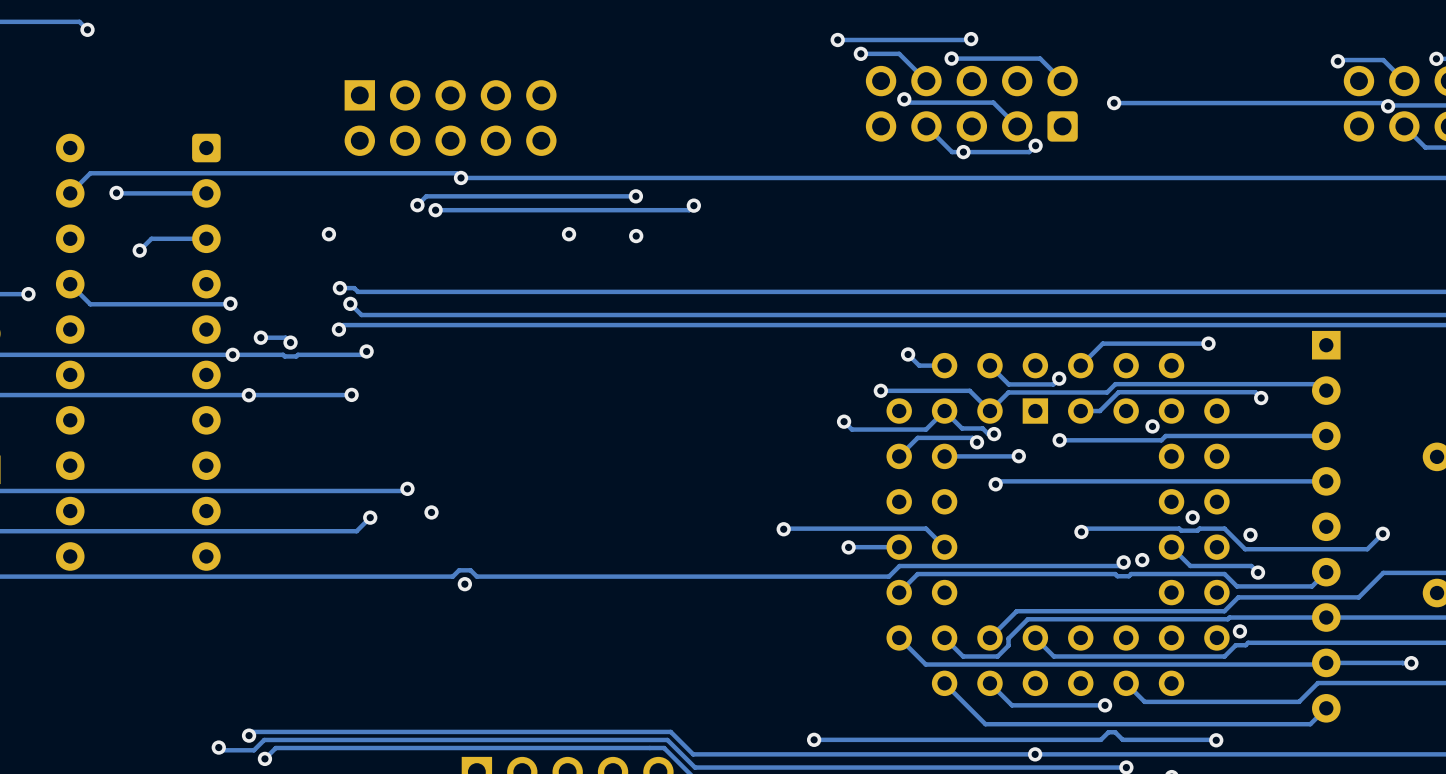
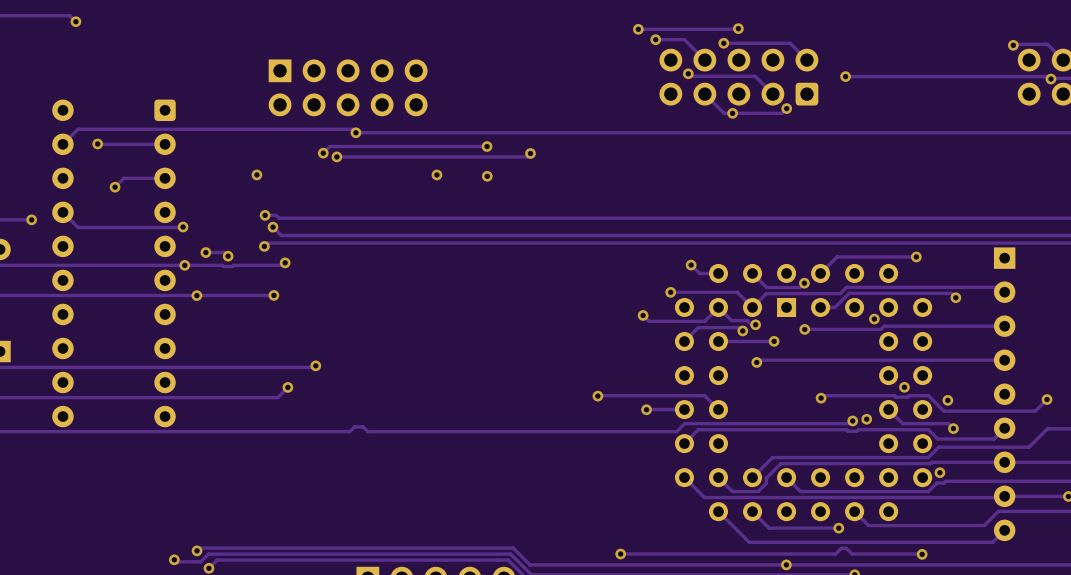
via: (431, 512) -> none
via: (464, 584) -> none

